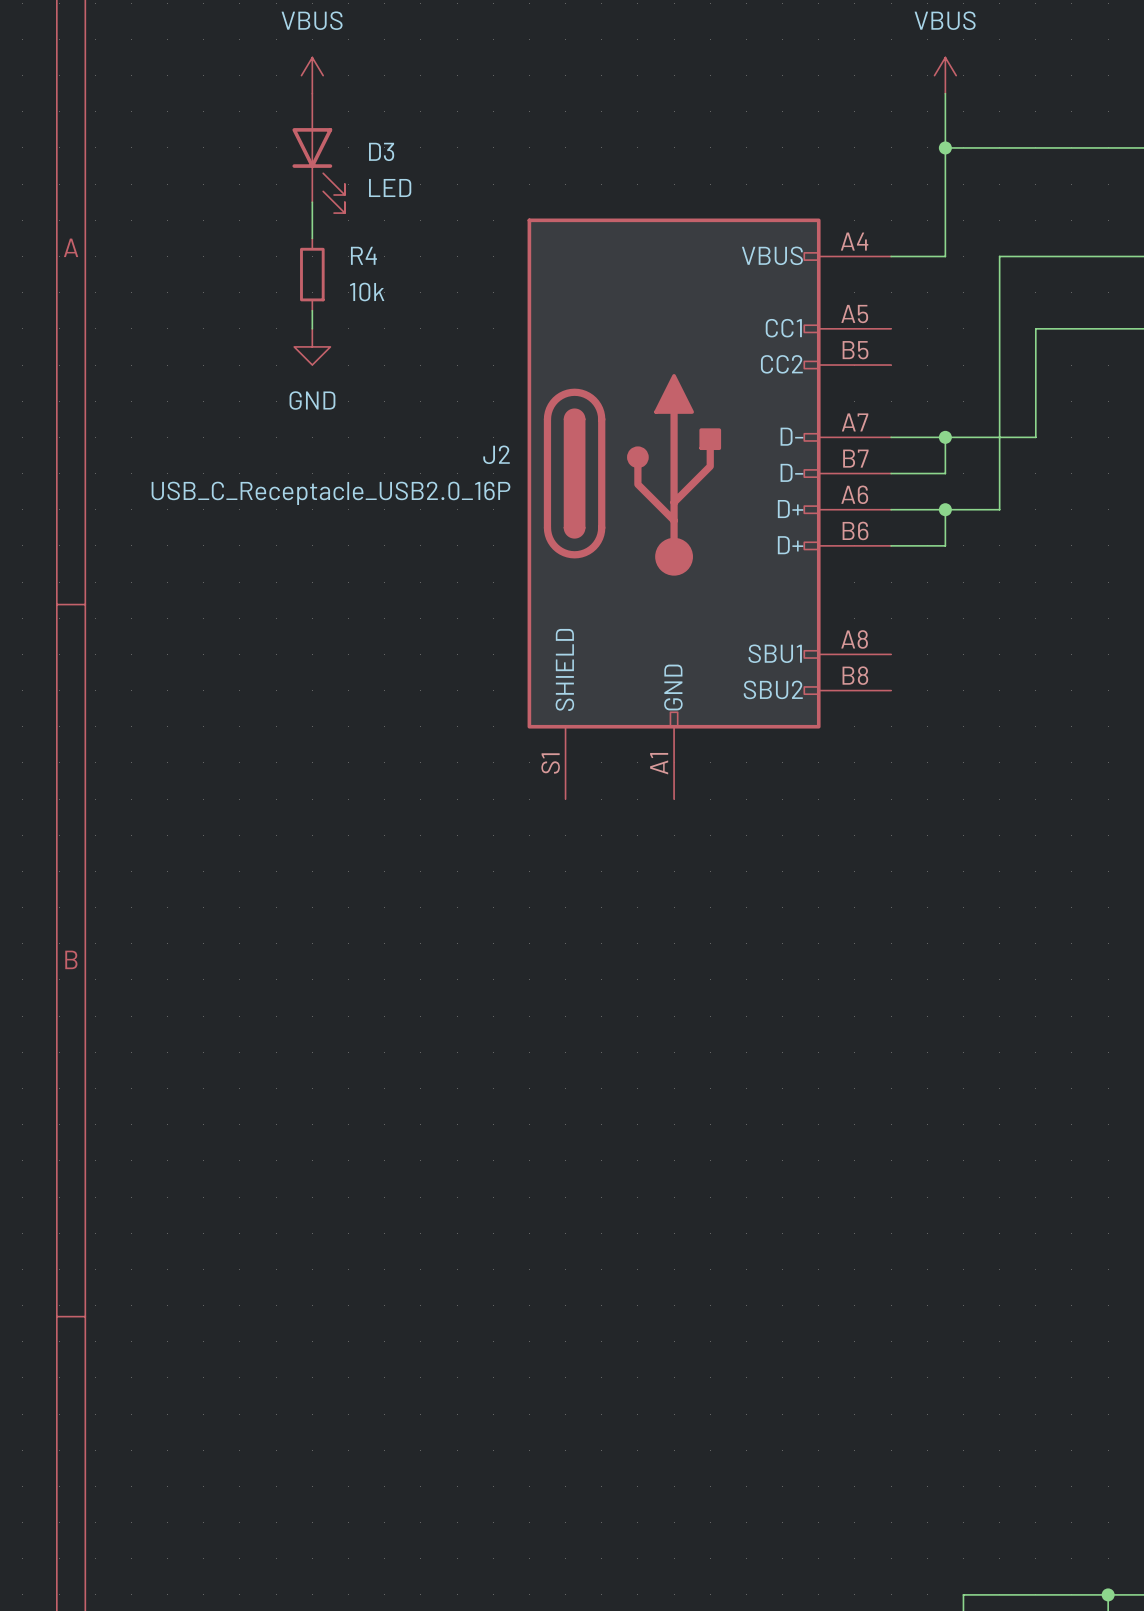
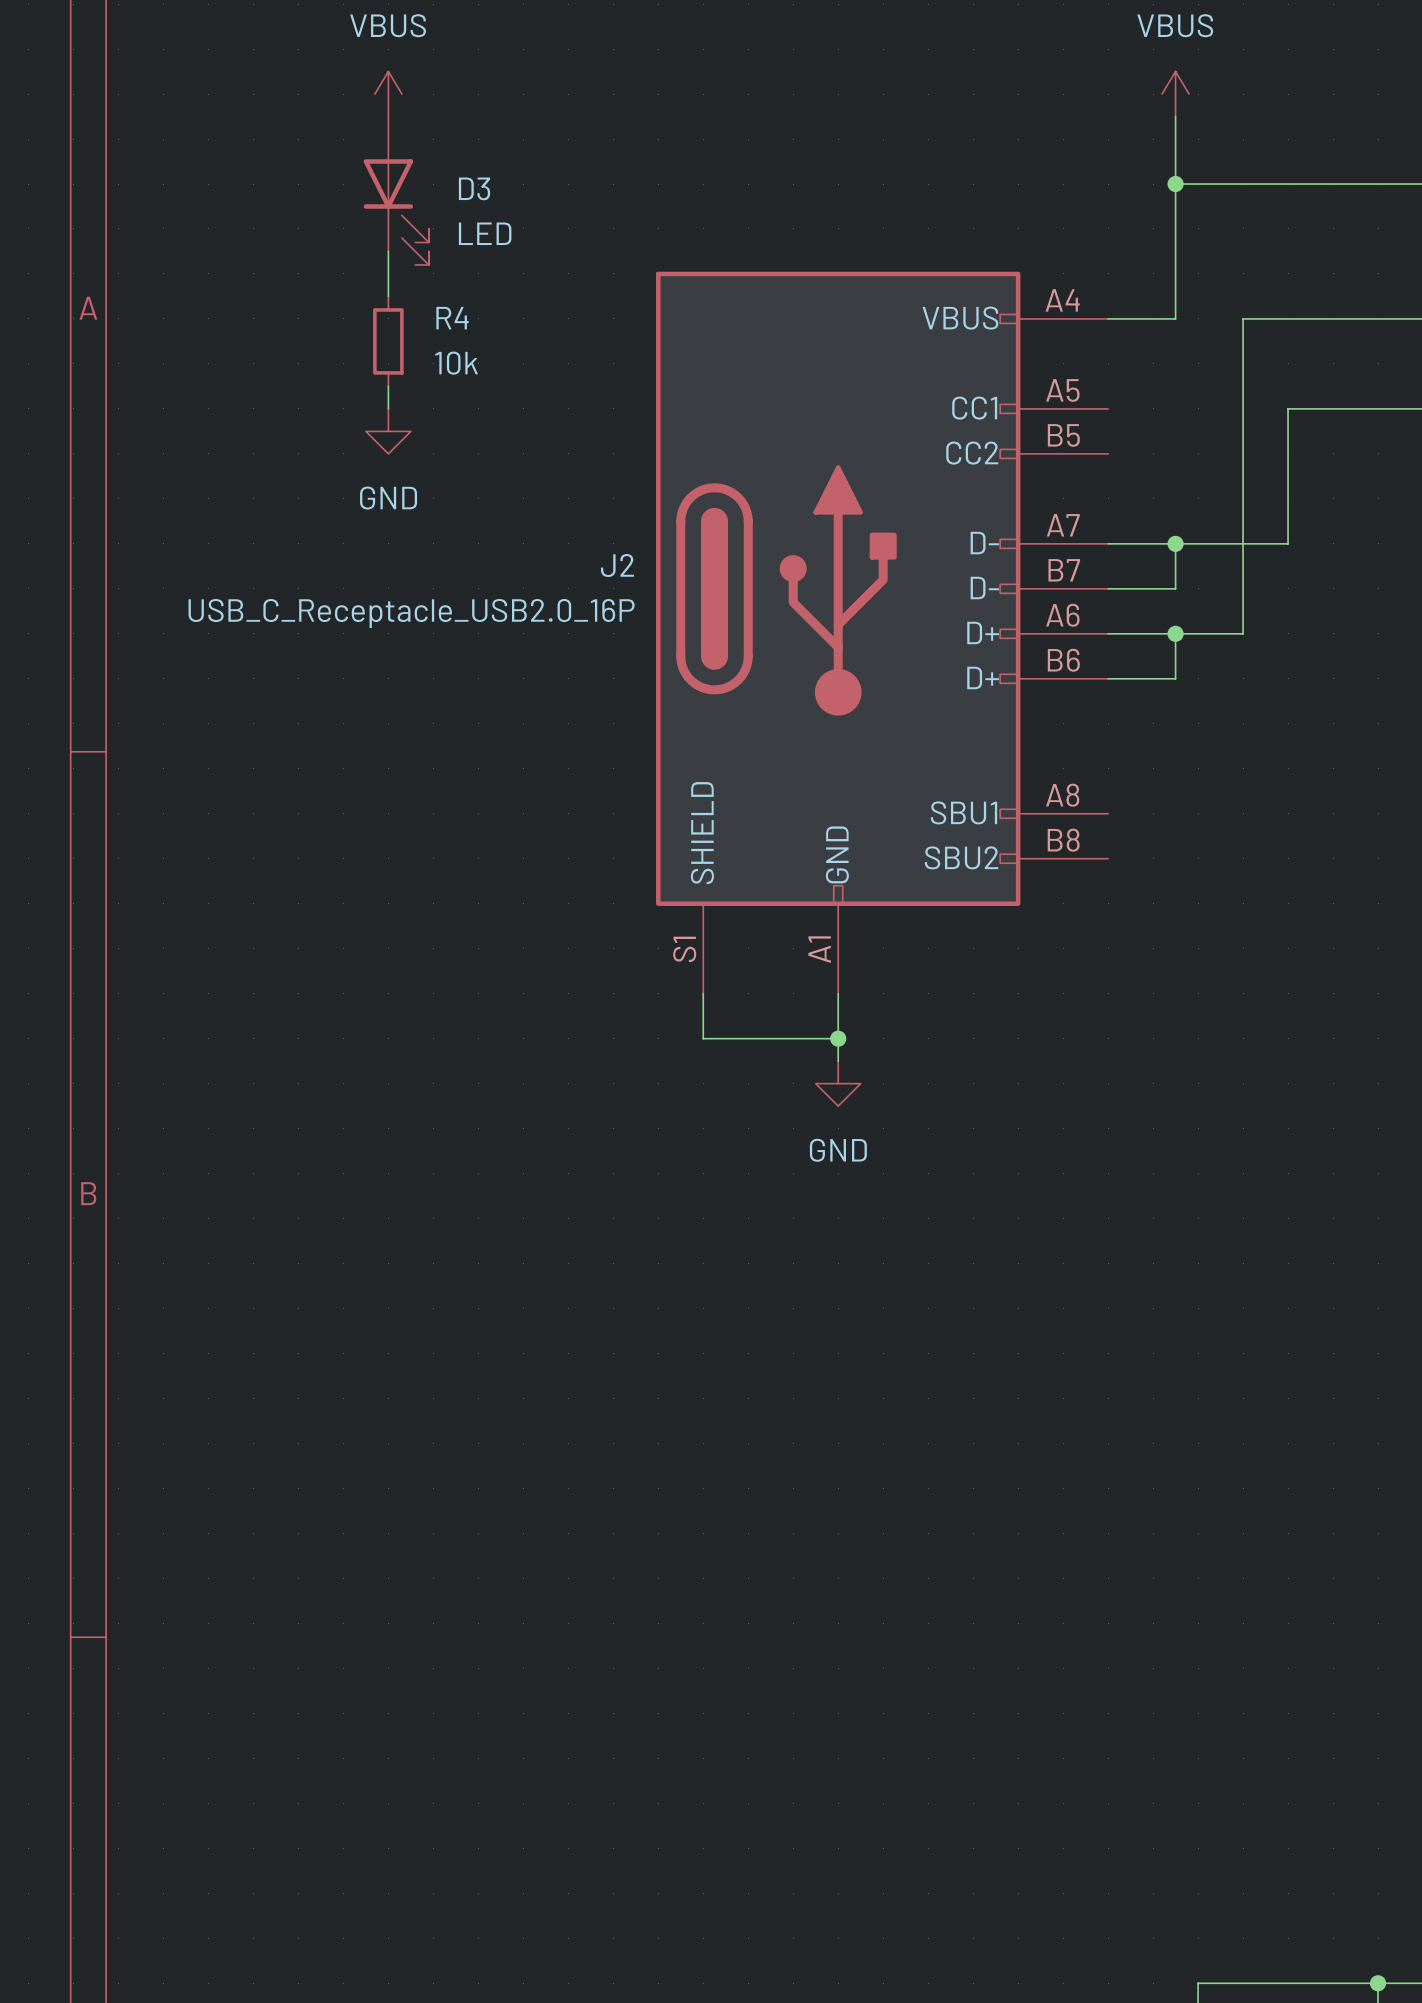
wire: none -> (703, 993) (703, 1038) (838, 1038)
wire: none -> (838, 993) (838, 1061)
junction: none -> (838, 1038)
power symbol: none -> GND (838, 1083)

